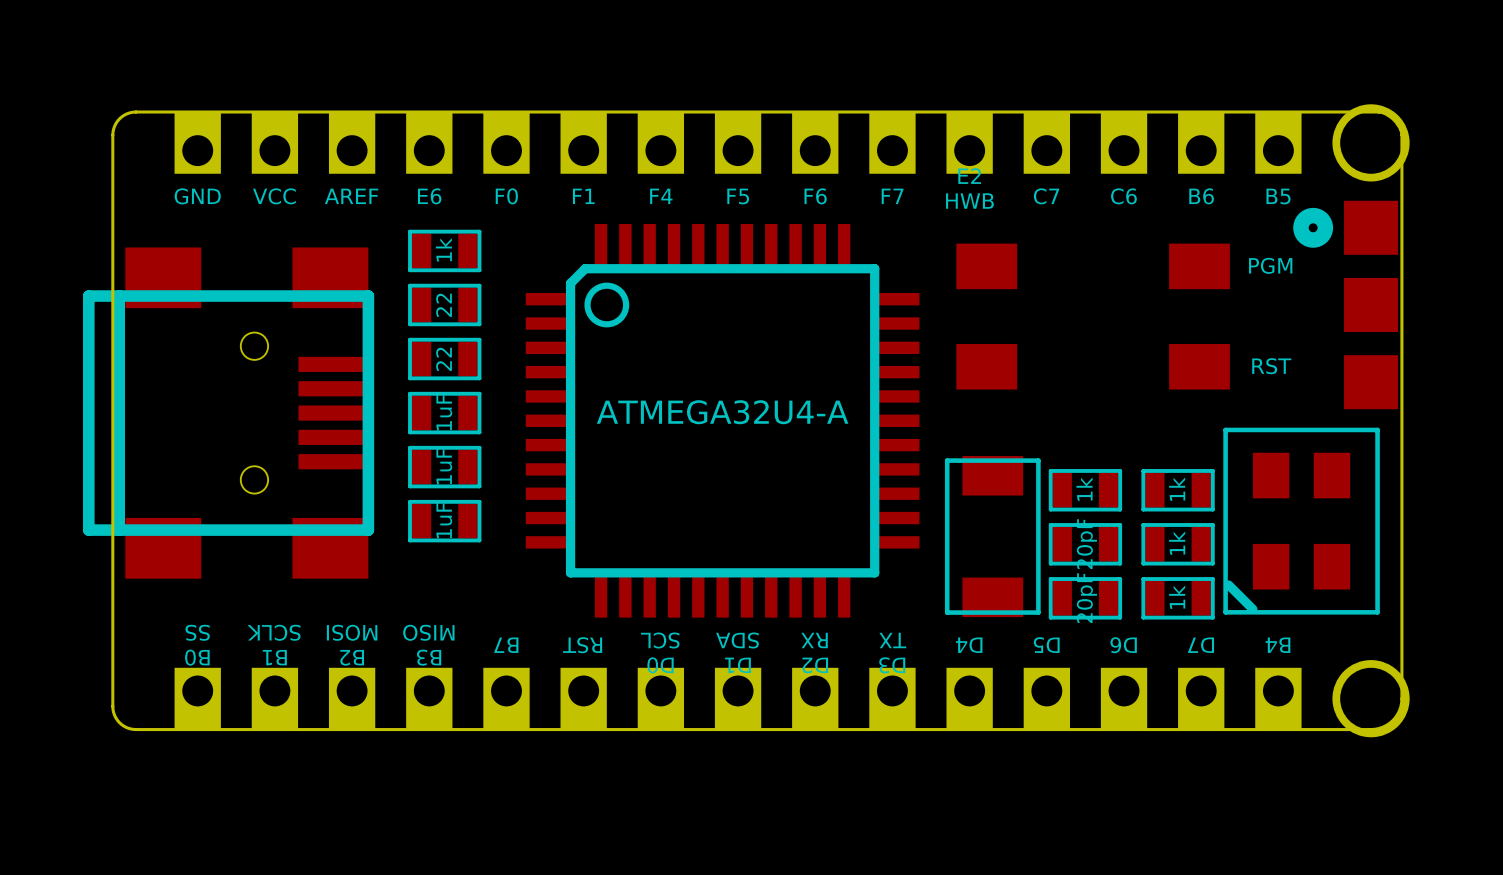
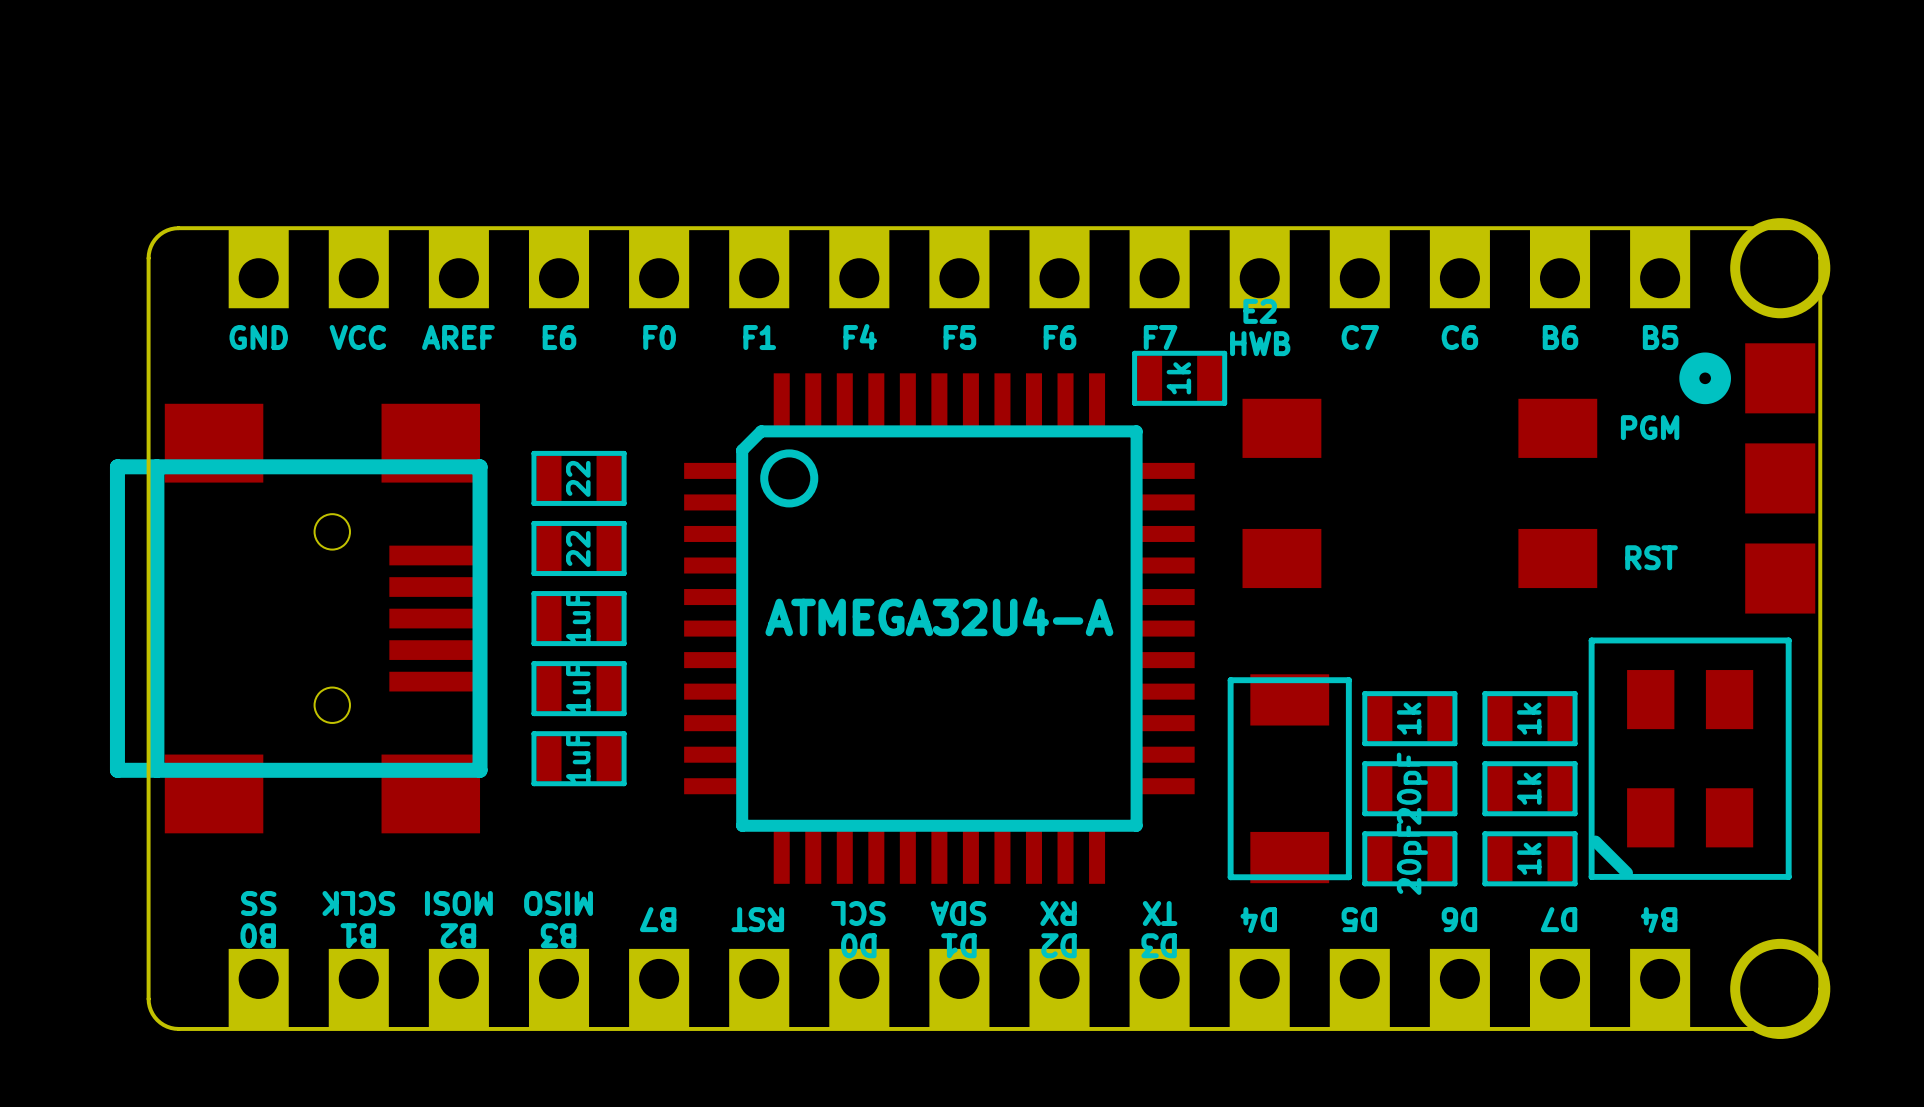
part position: (444, 250) -> (1179, 378)

